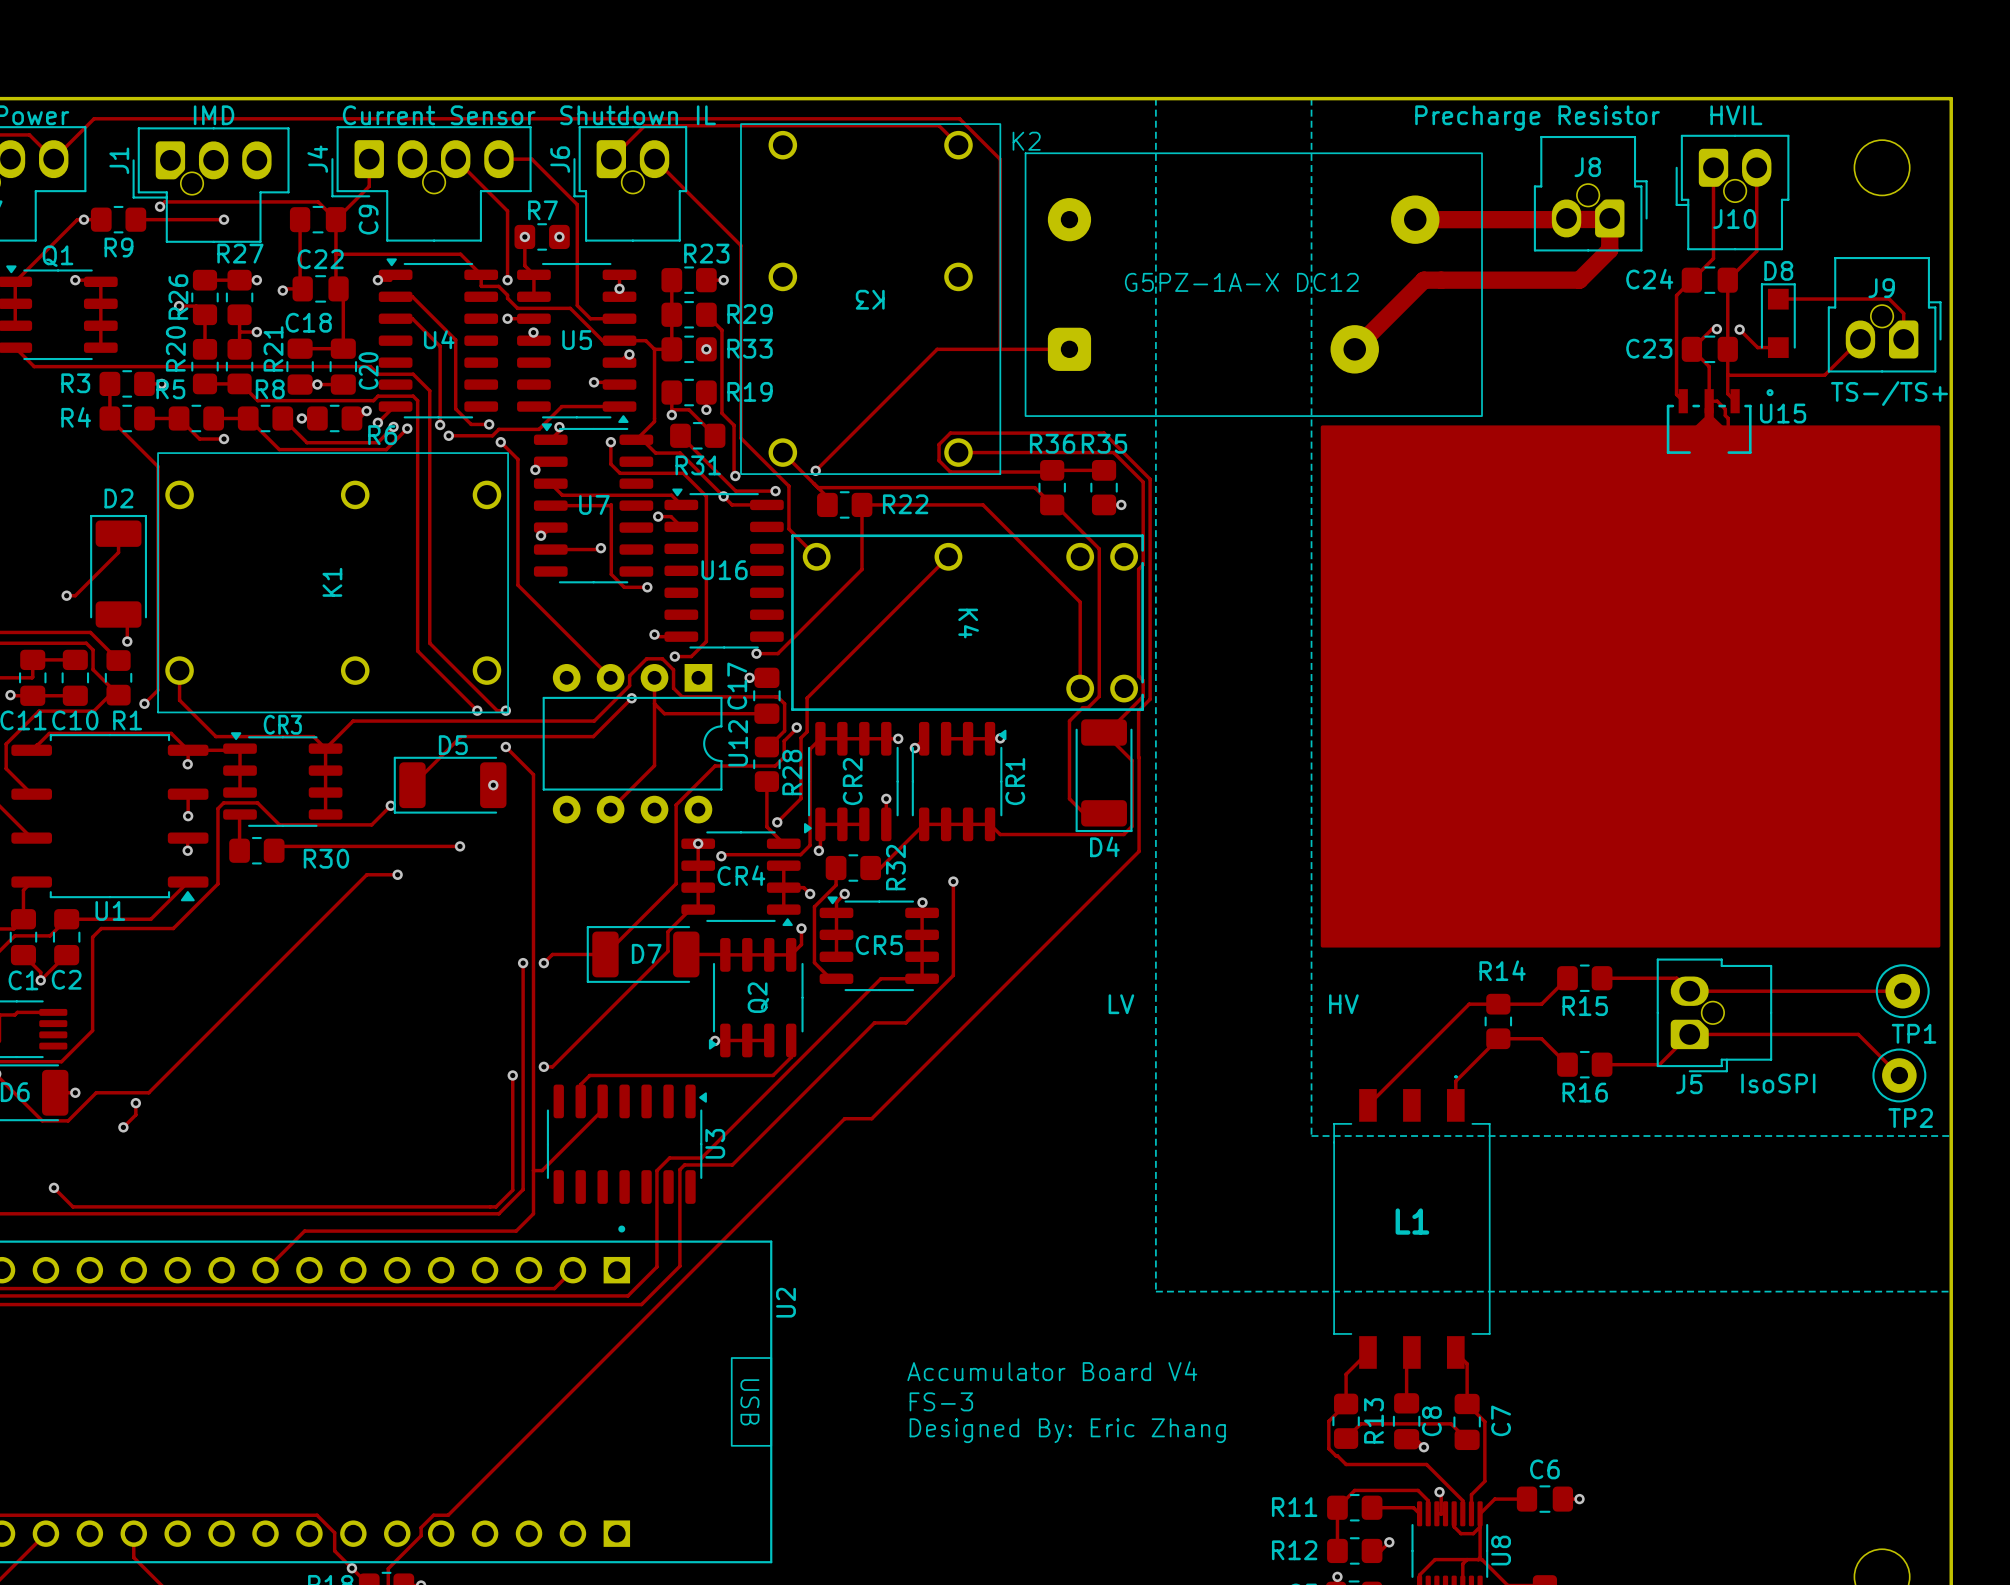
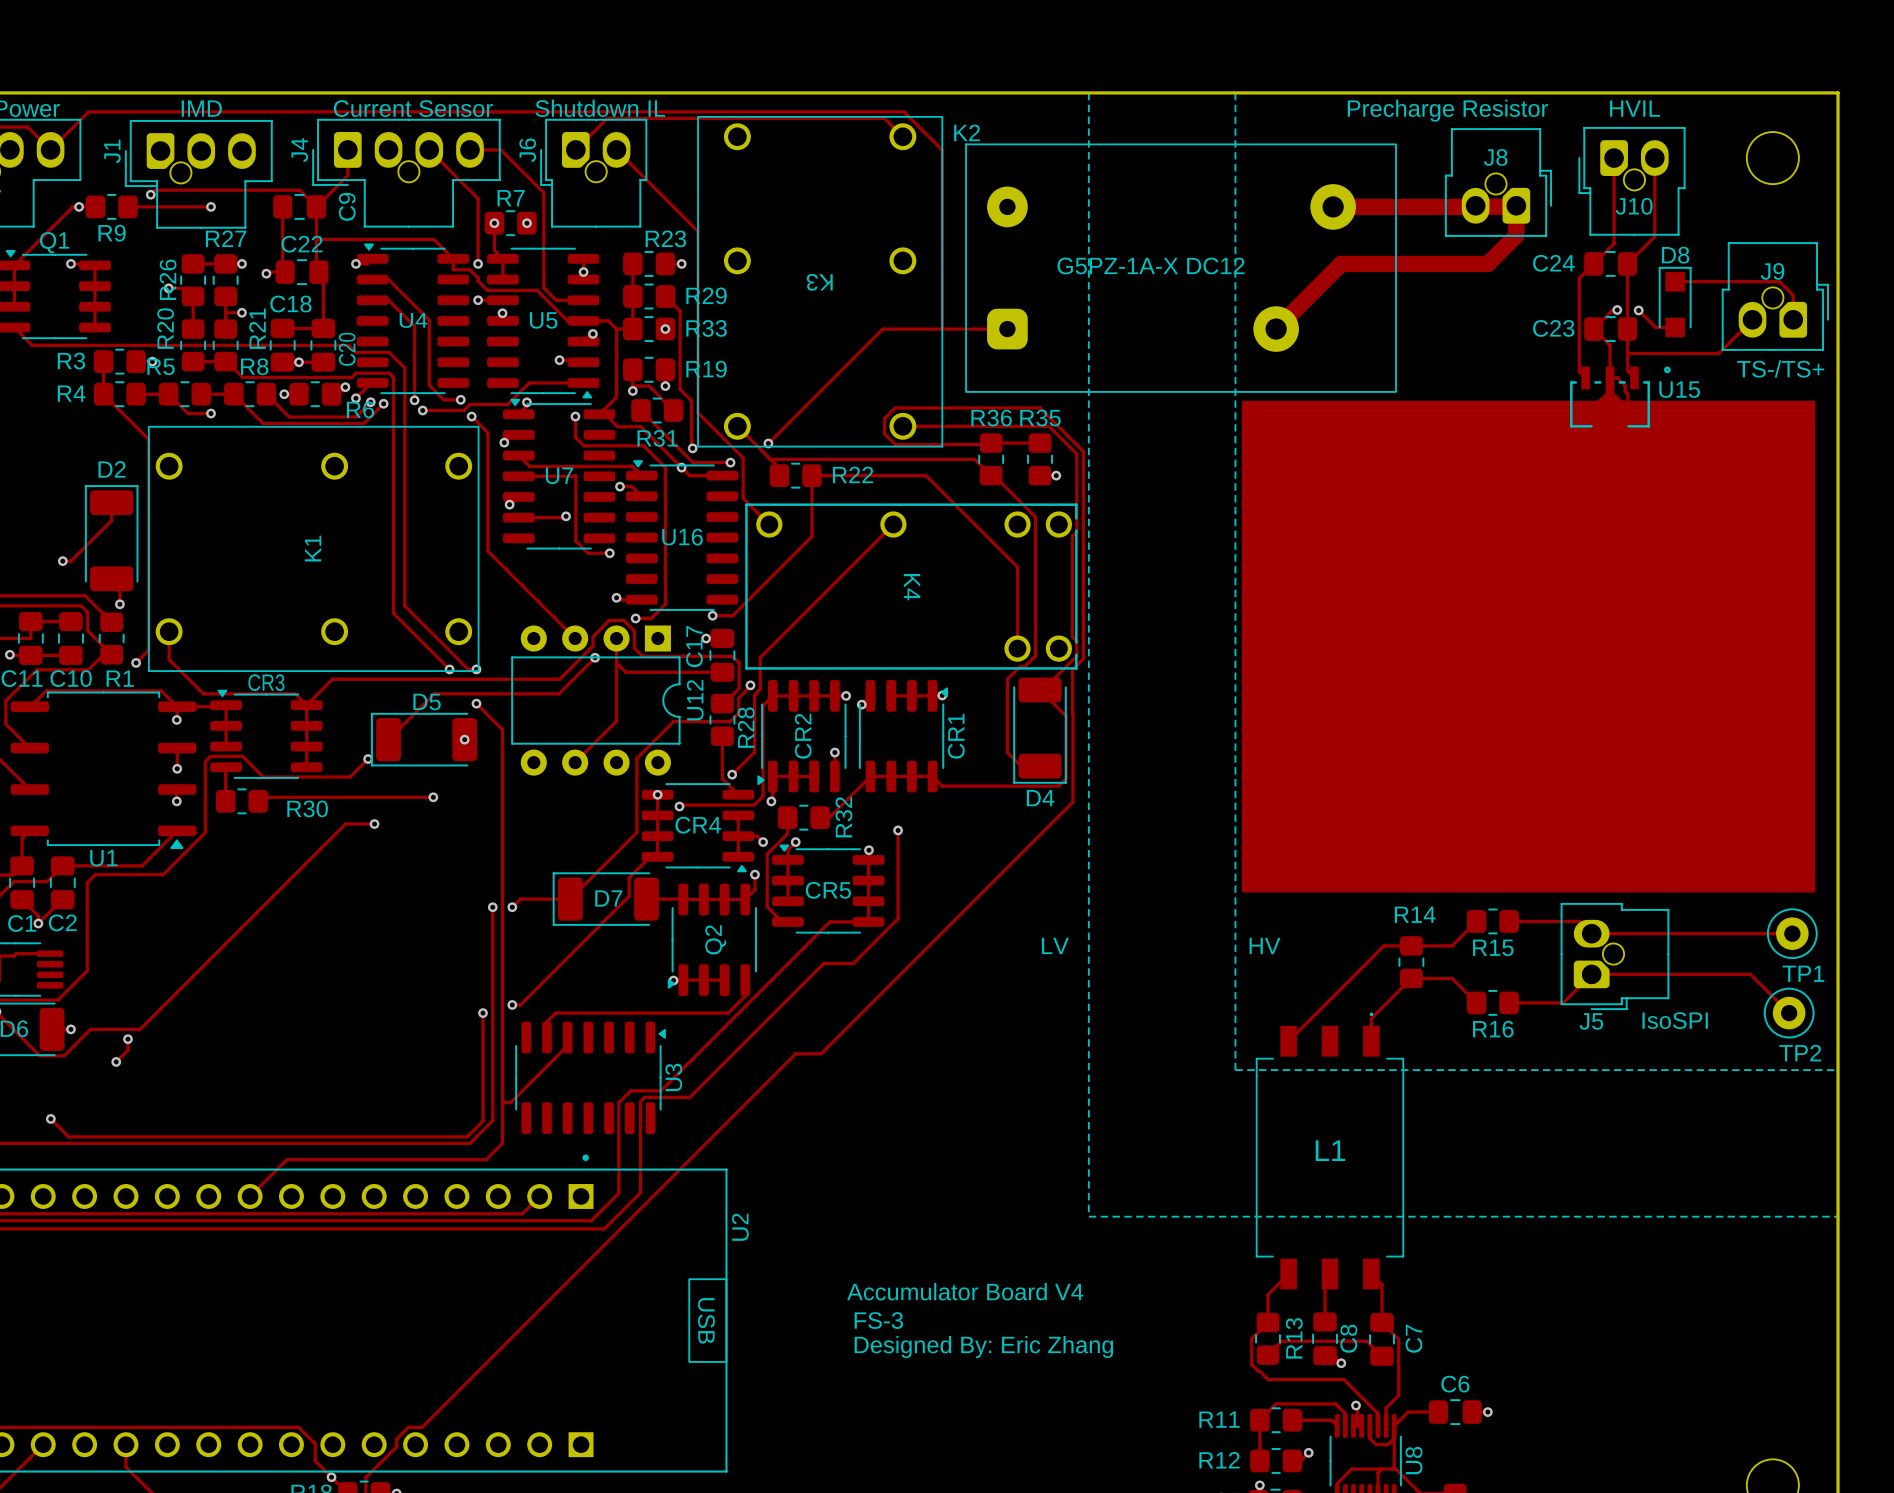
drawing shape: [1320, 425, 1941, 948] -> [1241, 400, 1816, 893]

